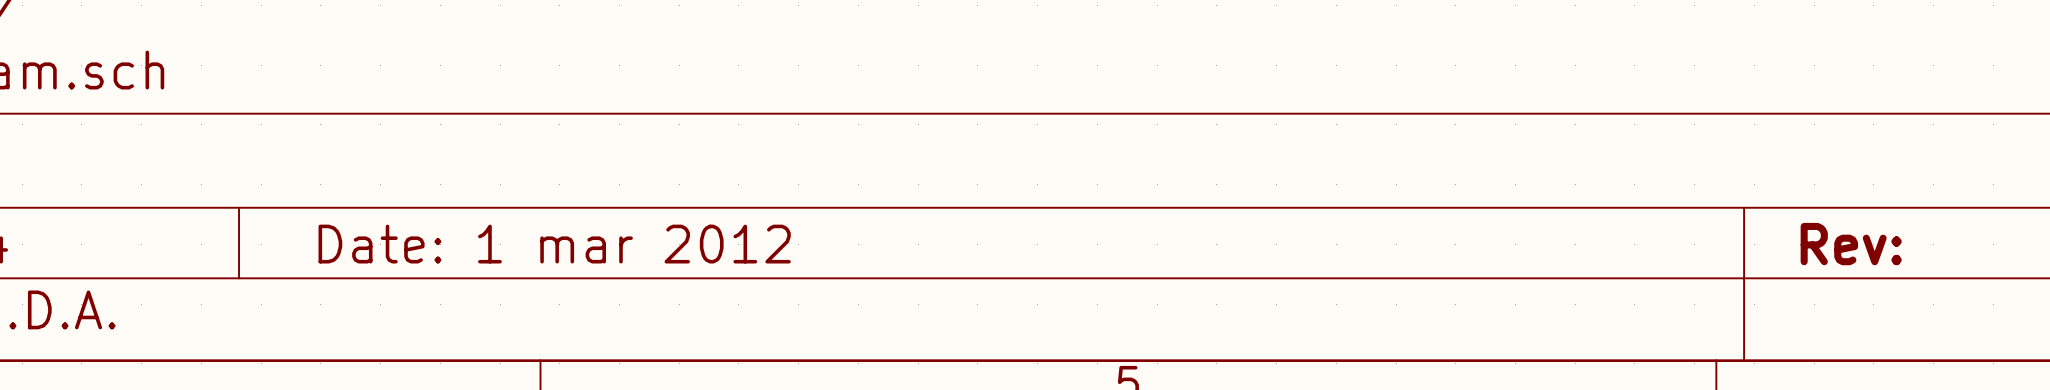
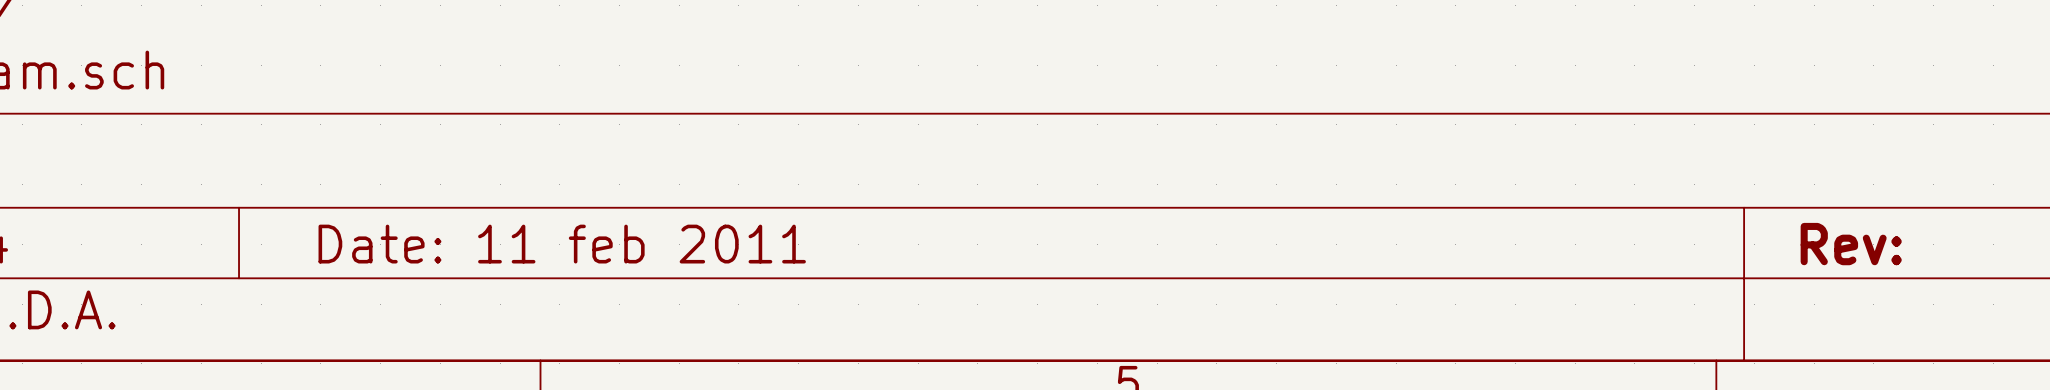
title block: Date: 1 mar 2012 (554, 244) -> Date: 11 feb 2011 (562, 244)

